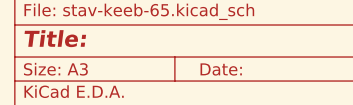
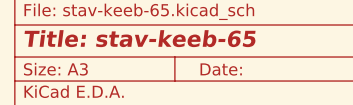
title block: Title: (55, 38) -> Title: stav-keeb-65 (140, 38)

